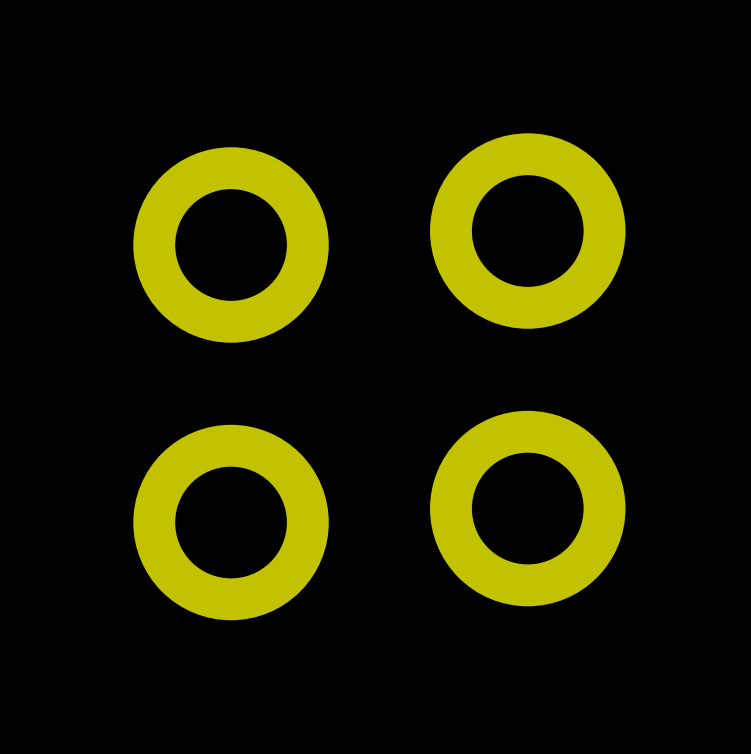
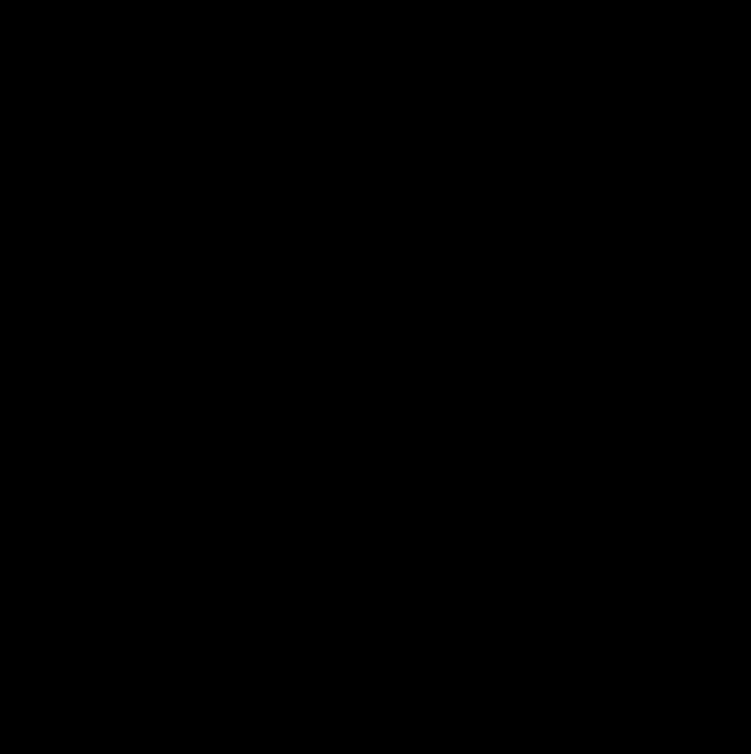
part: (527, 231) -> none
part: (231, 244) -> none
part: (527, 508) -> none
part: (231, 522) -> none

